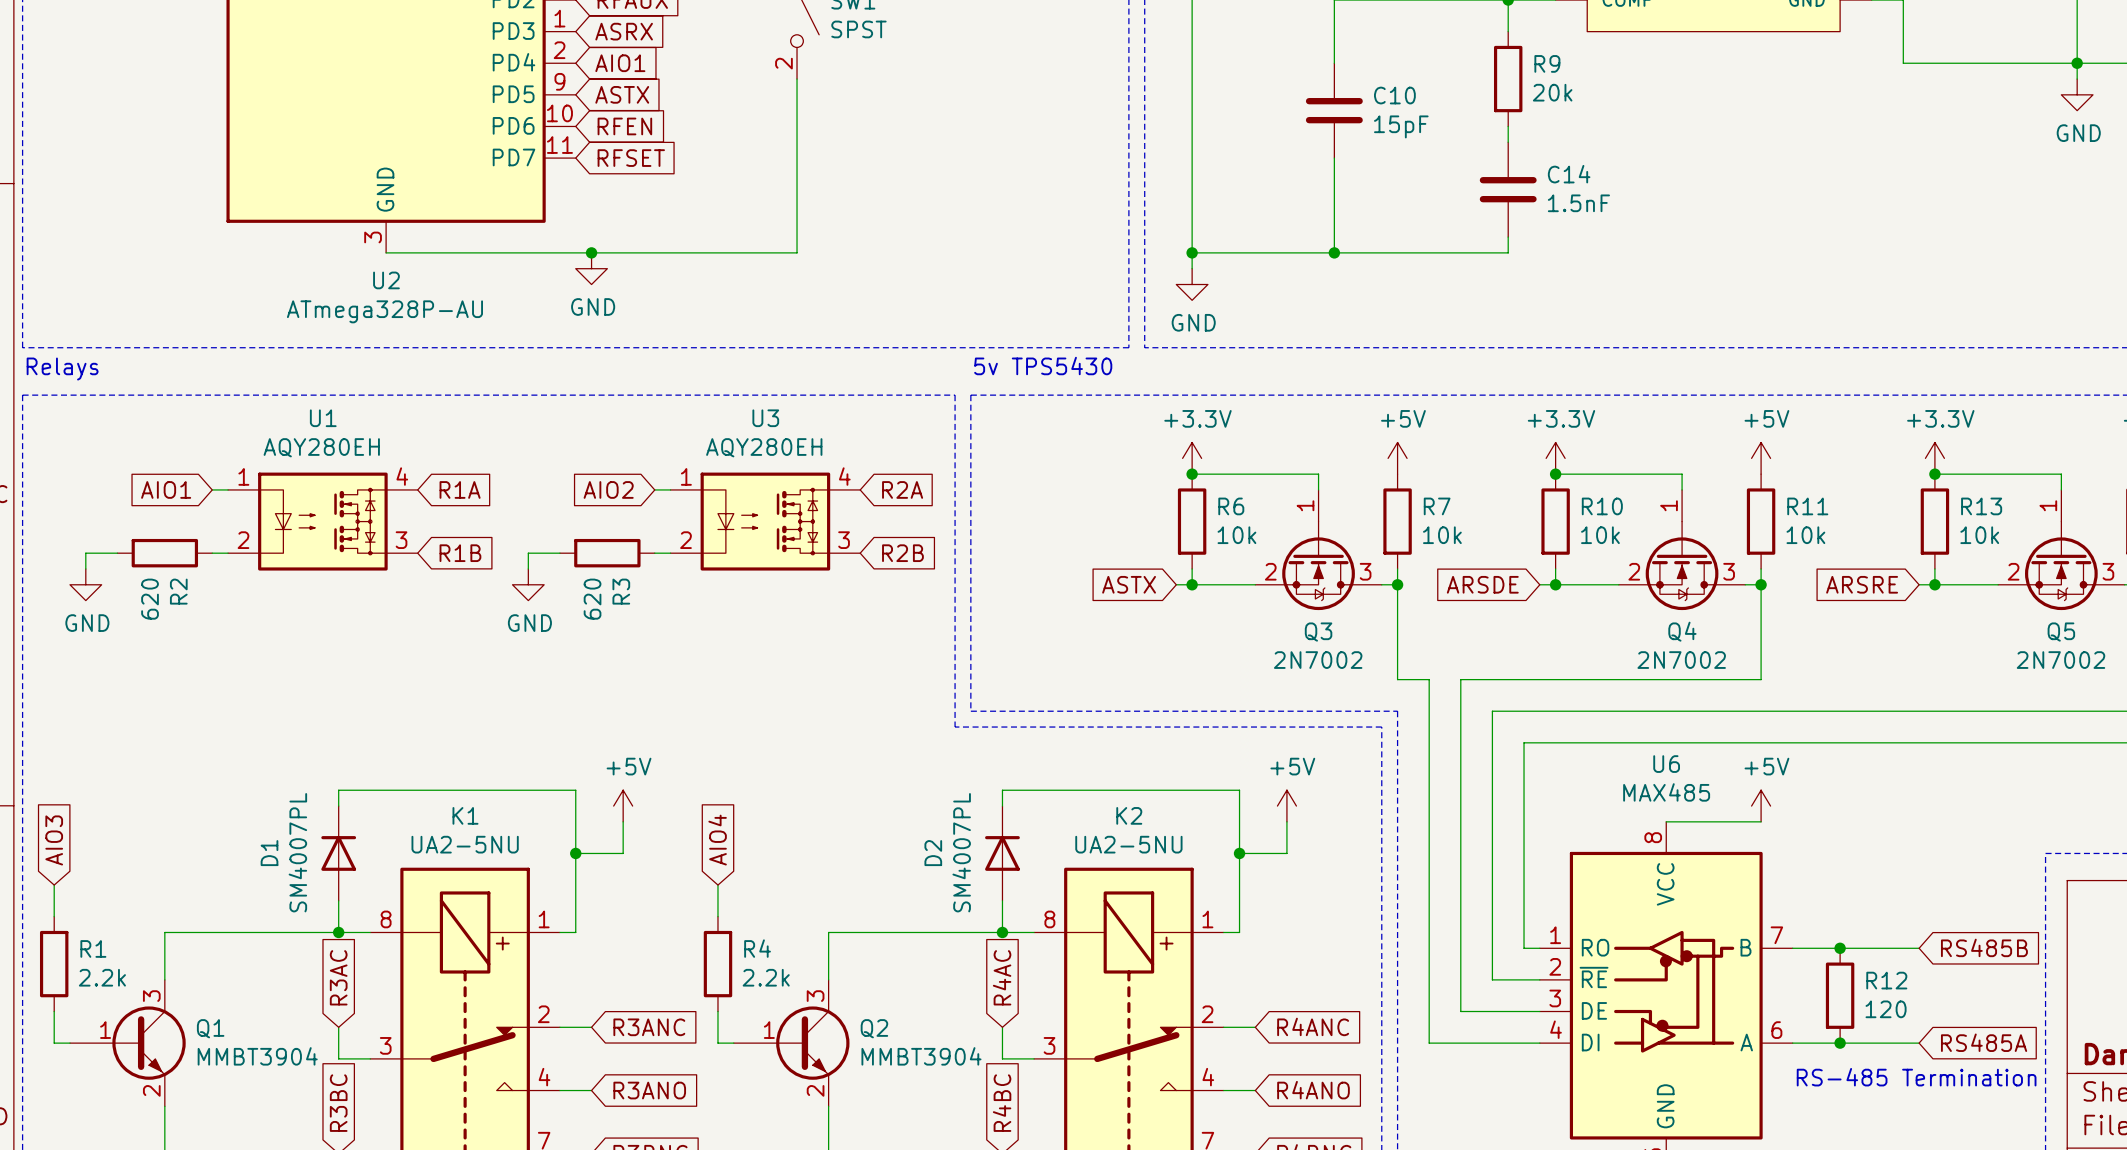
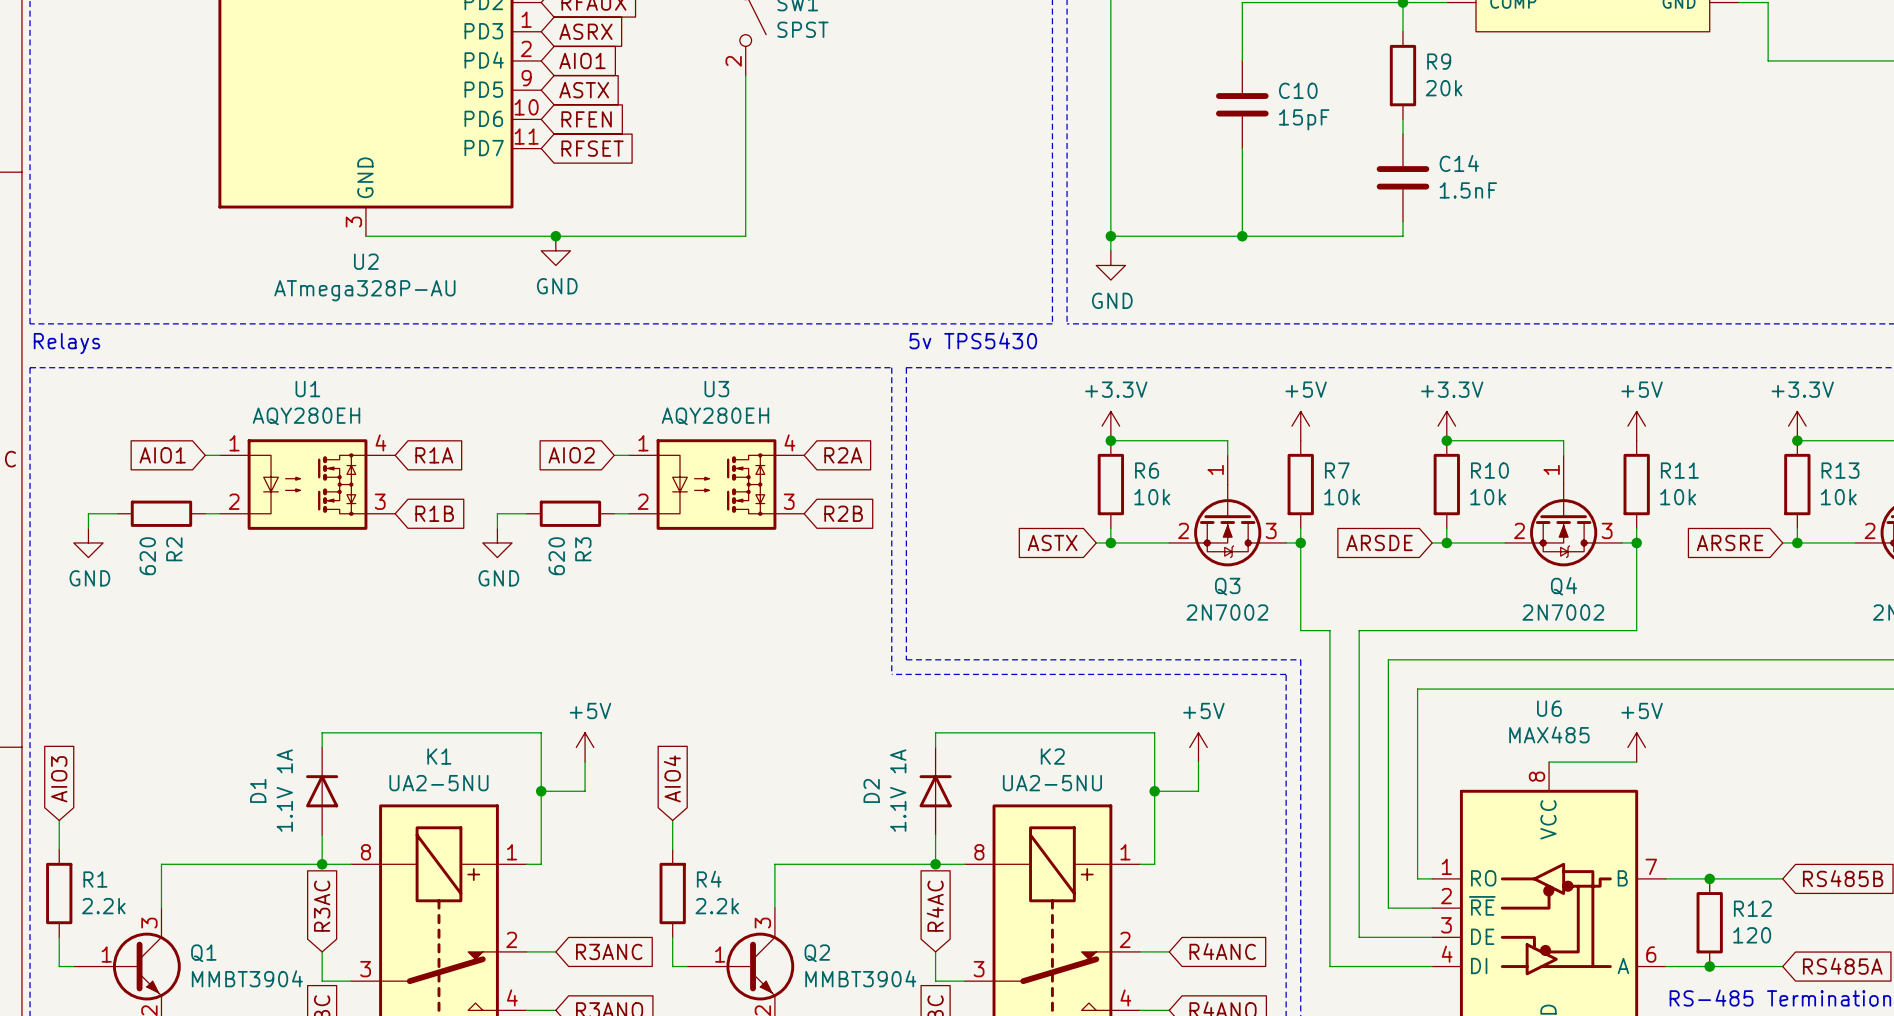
D1 value: SM4007PL (297, 852) -> 1.1V 1A (284, 790)
D2 value: SM4007PL (961, 852) -> 1.1V 1A (898, 790)

